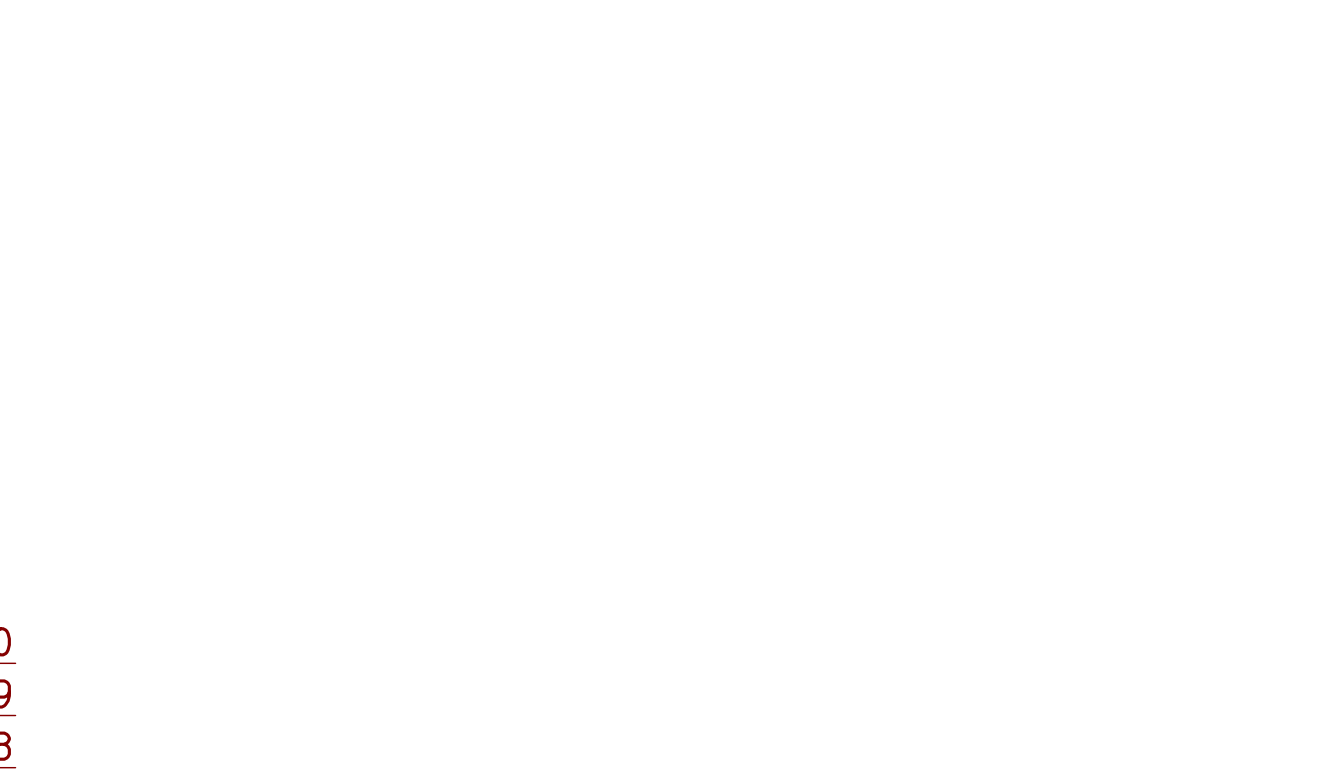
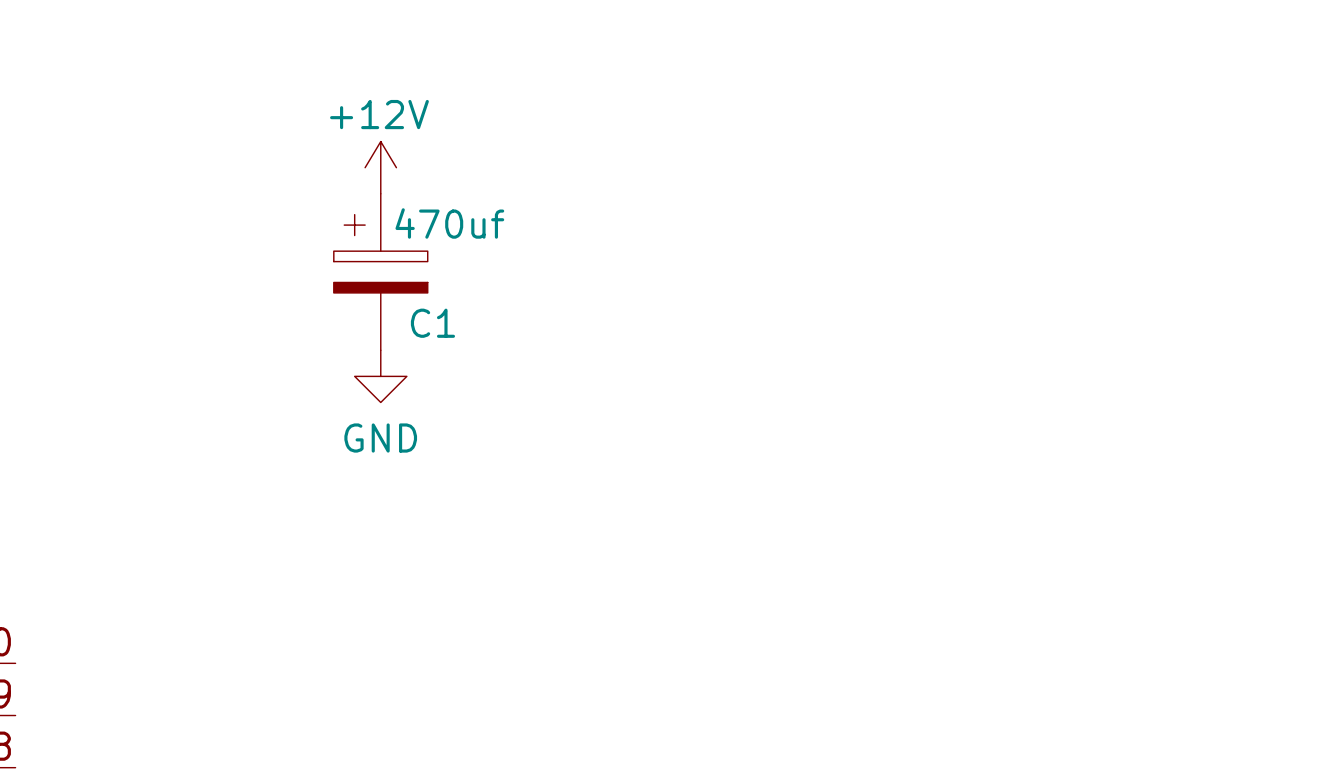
power symbol: none -> +12V (380, 167)
C1: none -> 470uf (380, 272)
power symbol: none -> GND (380, 376)

